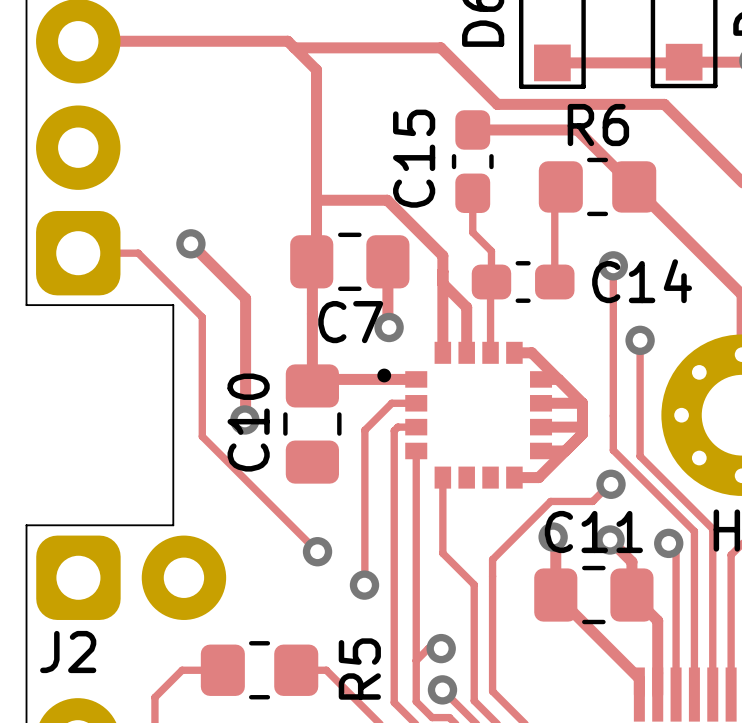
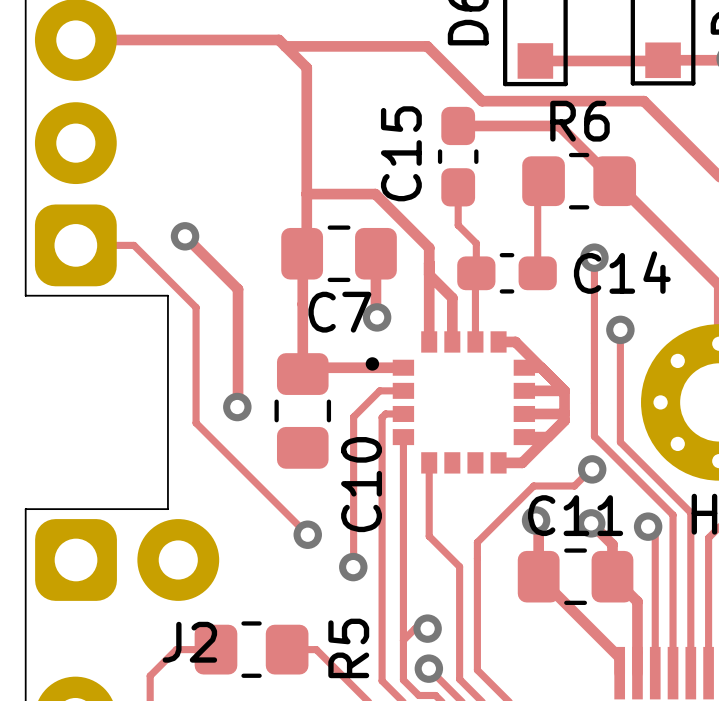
C10 name position: C10 (248, 422) -> C10 (361, 484)
J2 name position: J2 (68, 652) -> J2 (189, 642)

